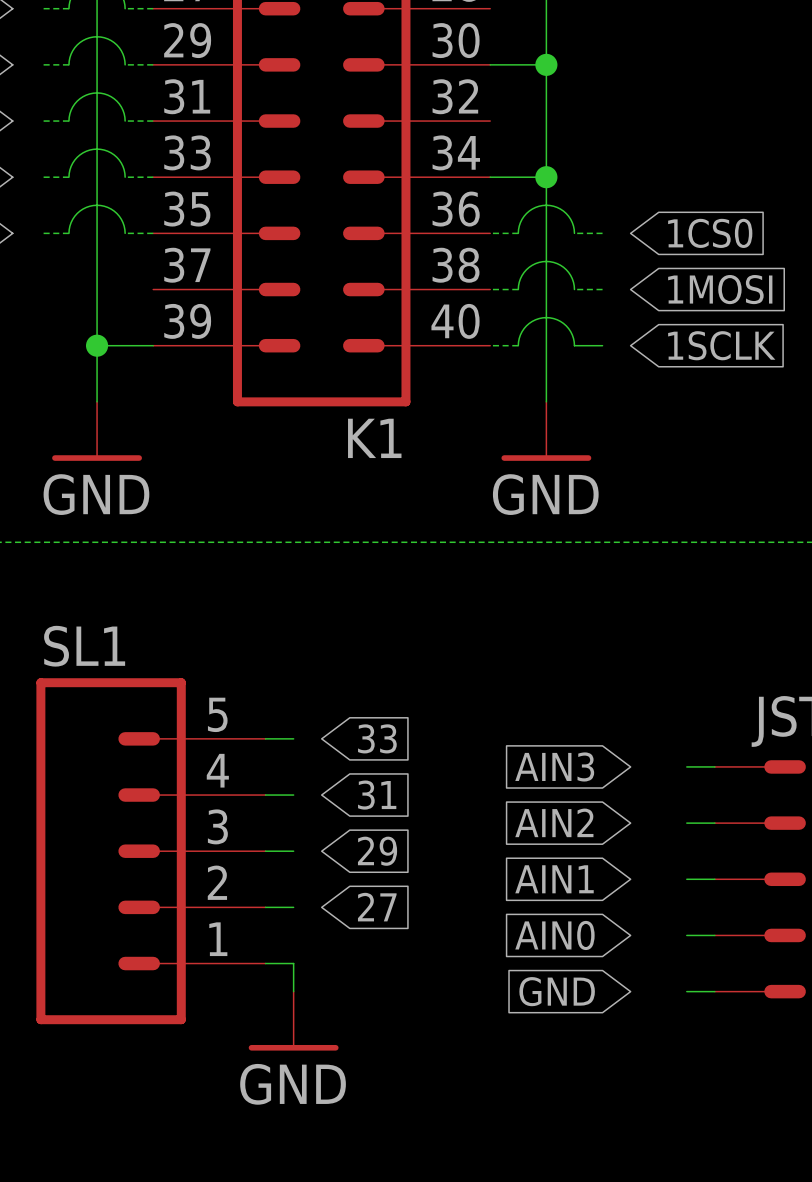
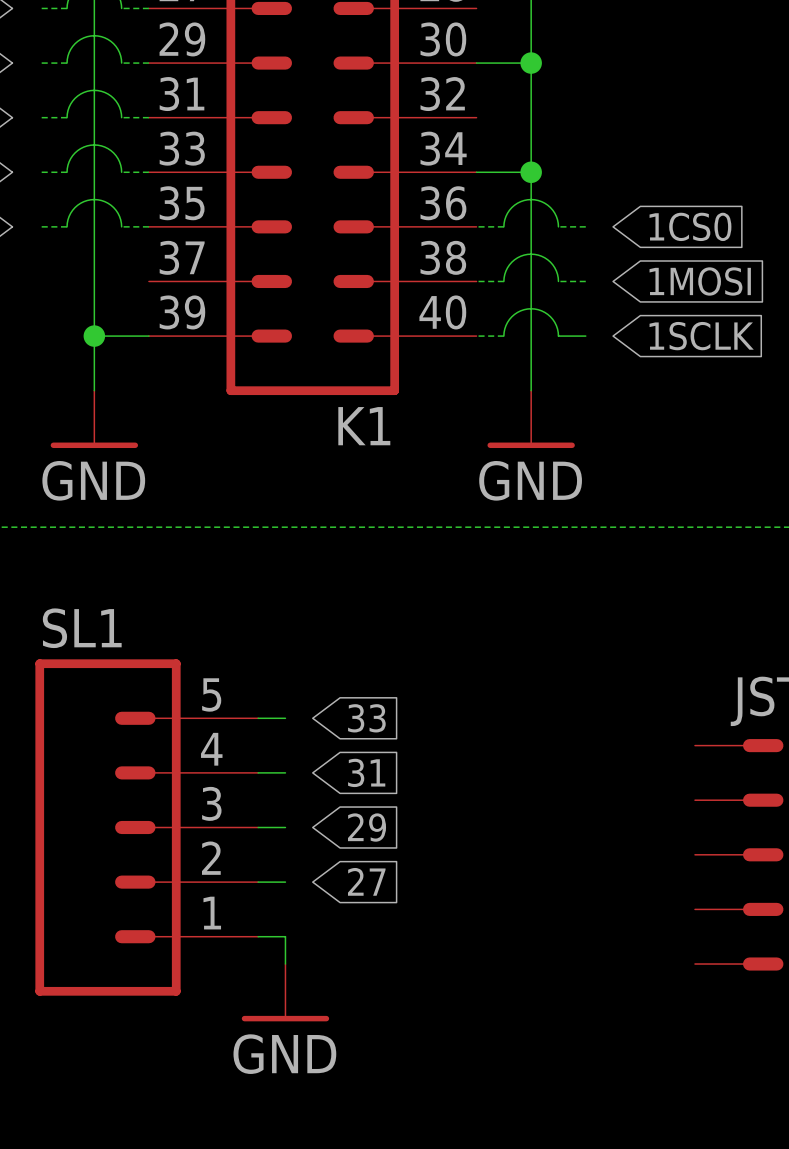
global label: AIN3 (554, 766) -> none
wire: (686, 766) (714, 766) -> none
global label: AIN2 (554, 822) -> none
wire: (686, 823) (714, 823) -> none
global label: AIN1 (554, 879) -> none
wire: (686, 879) (714, 879) -> none
global label: AIN0 (554, 935) -> none
wire: (686, 935) (714, 935) -> none
global label: GND (557, 991) -> none
wire: (686, 991) (714, 991) -> none

